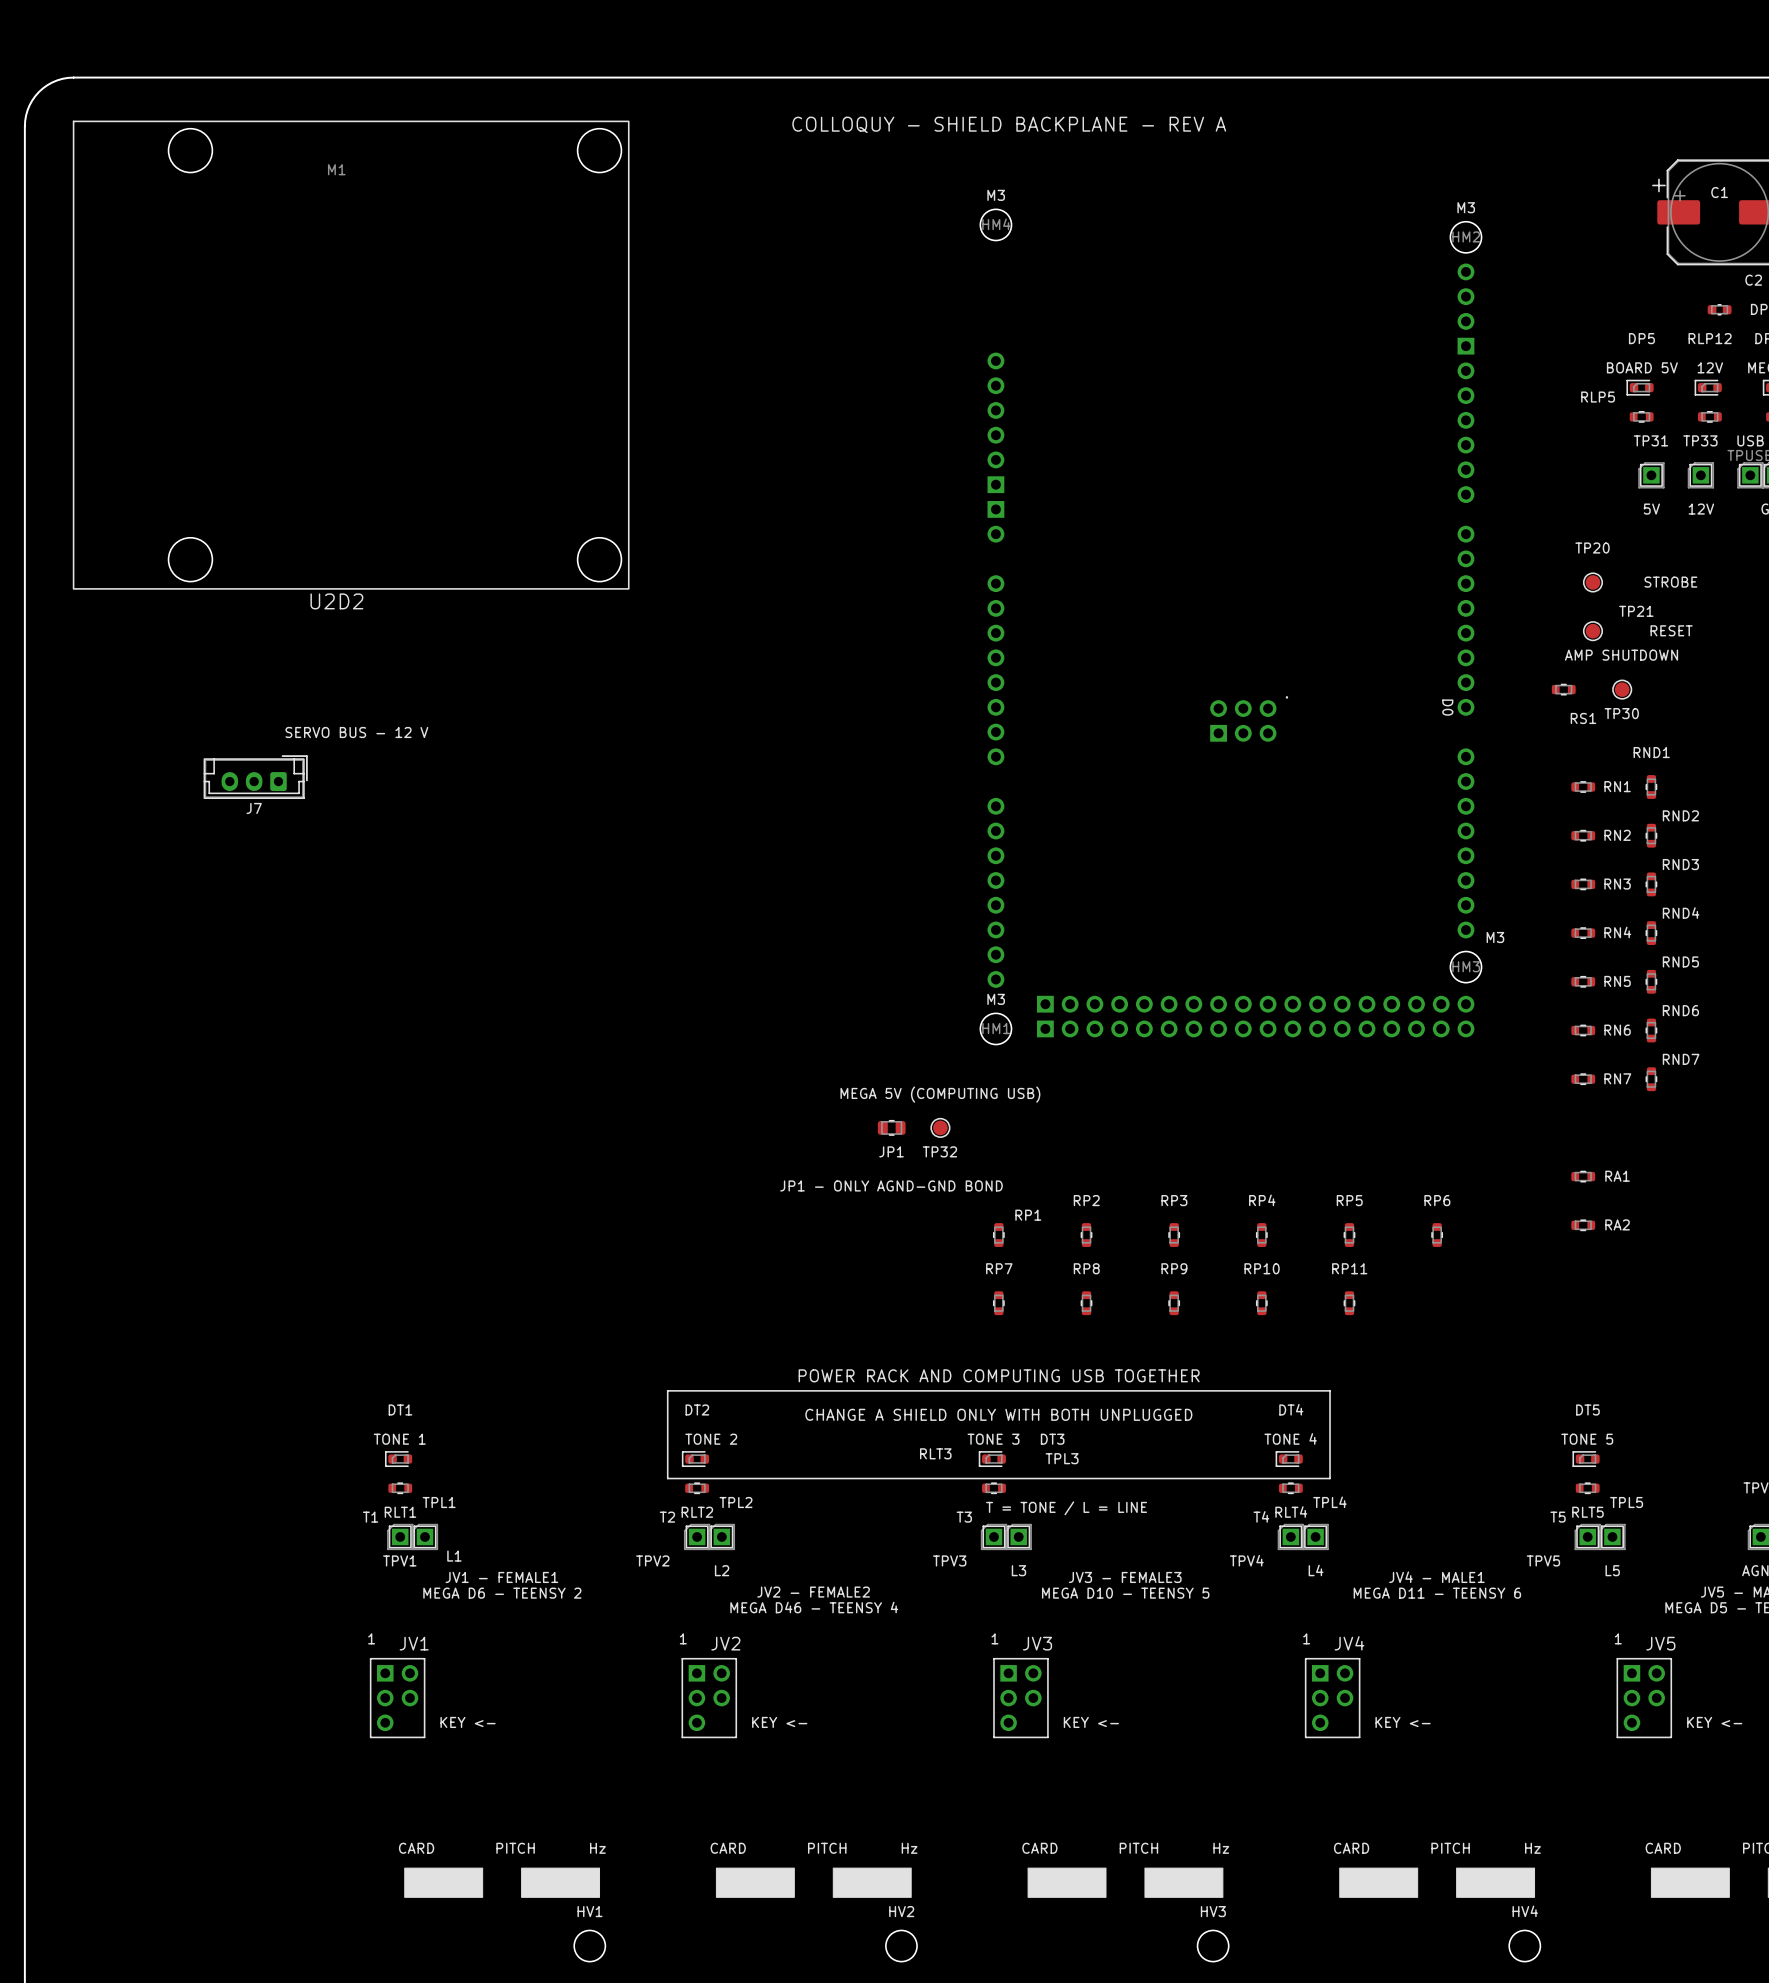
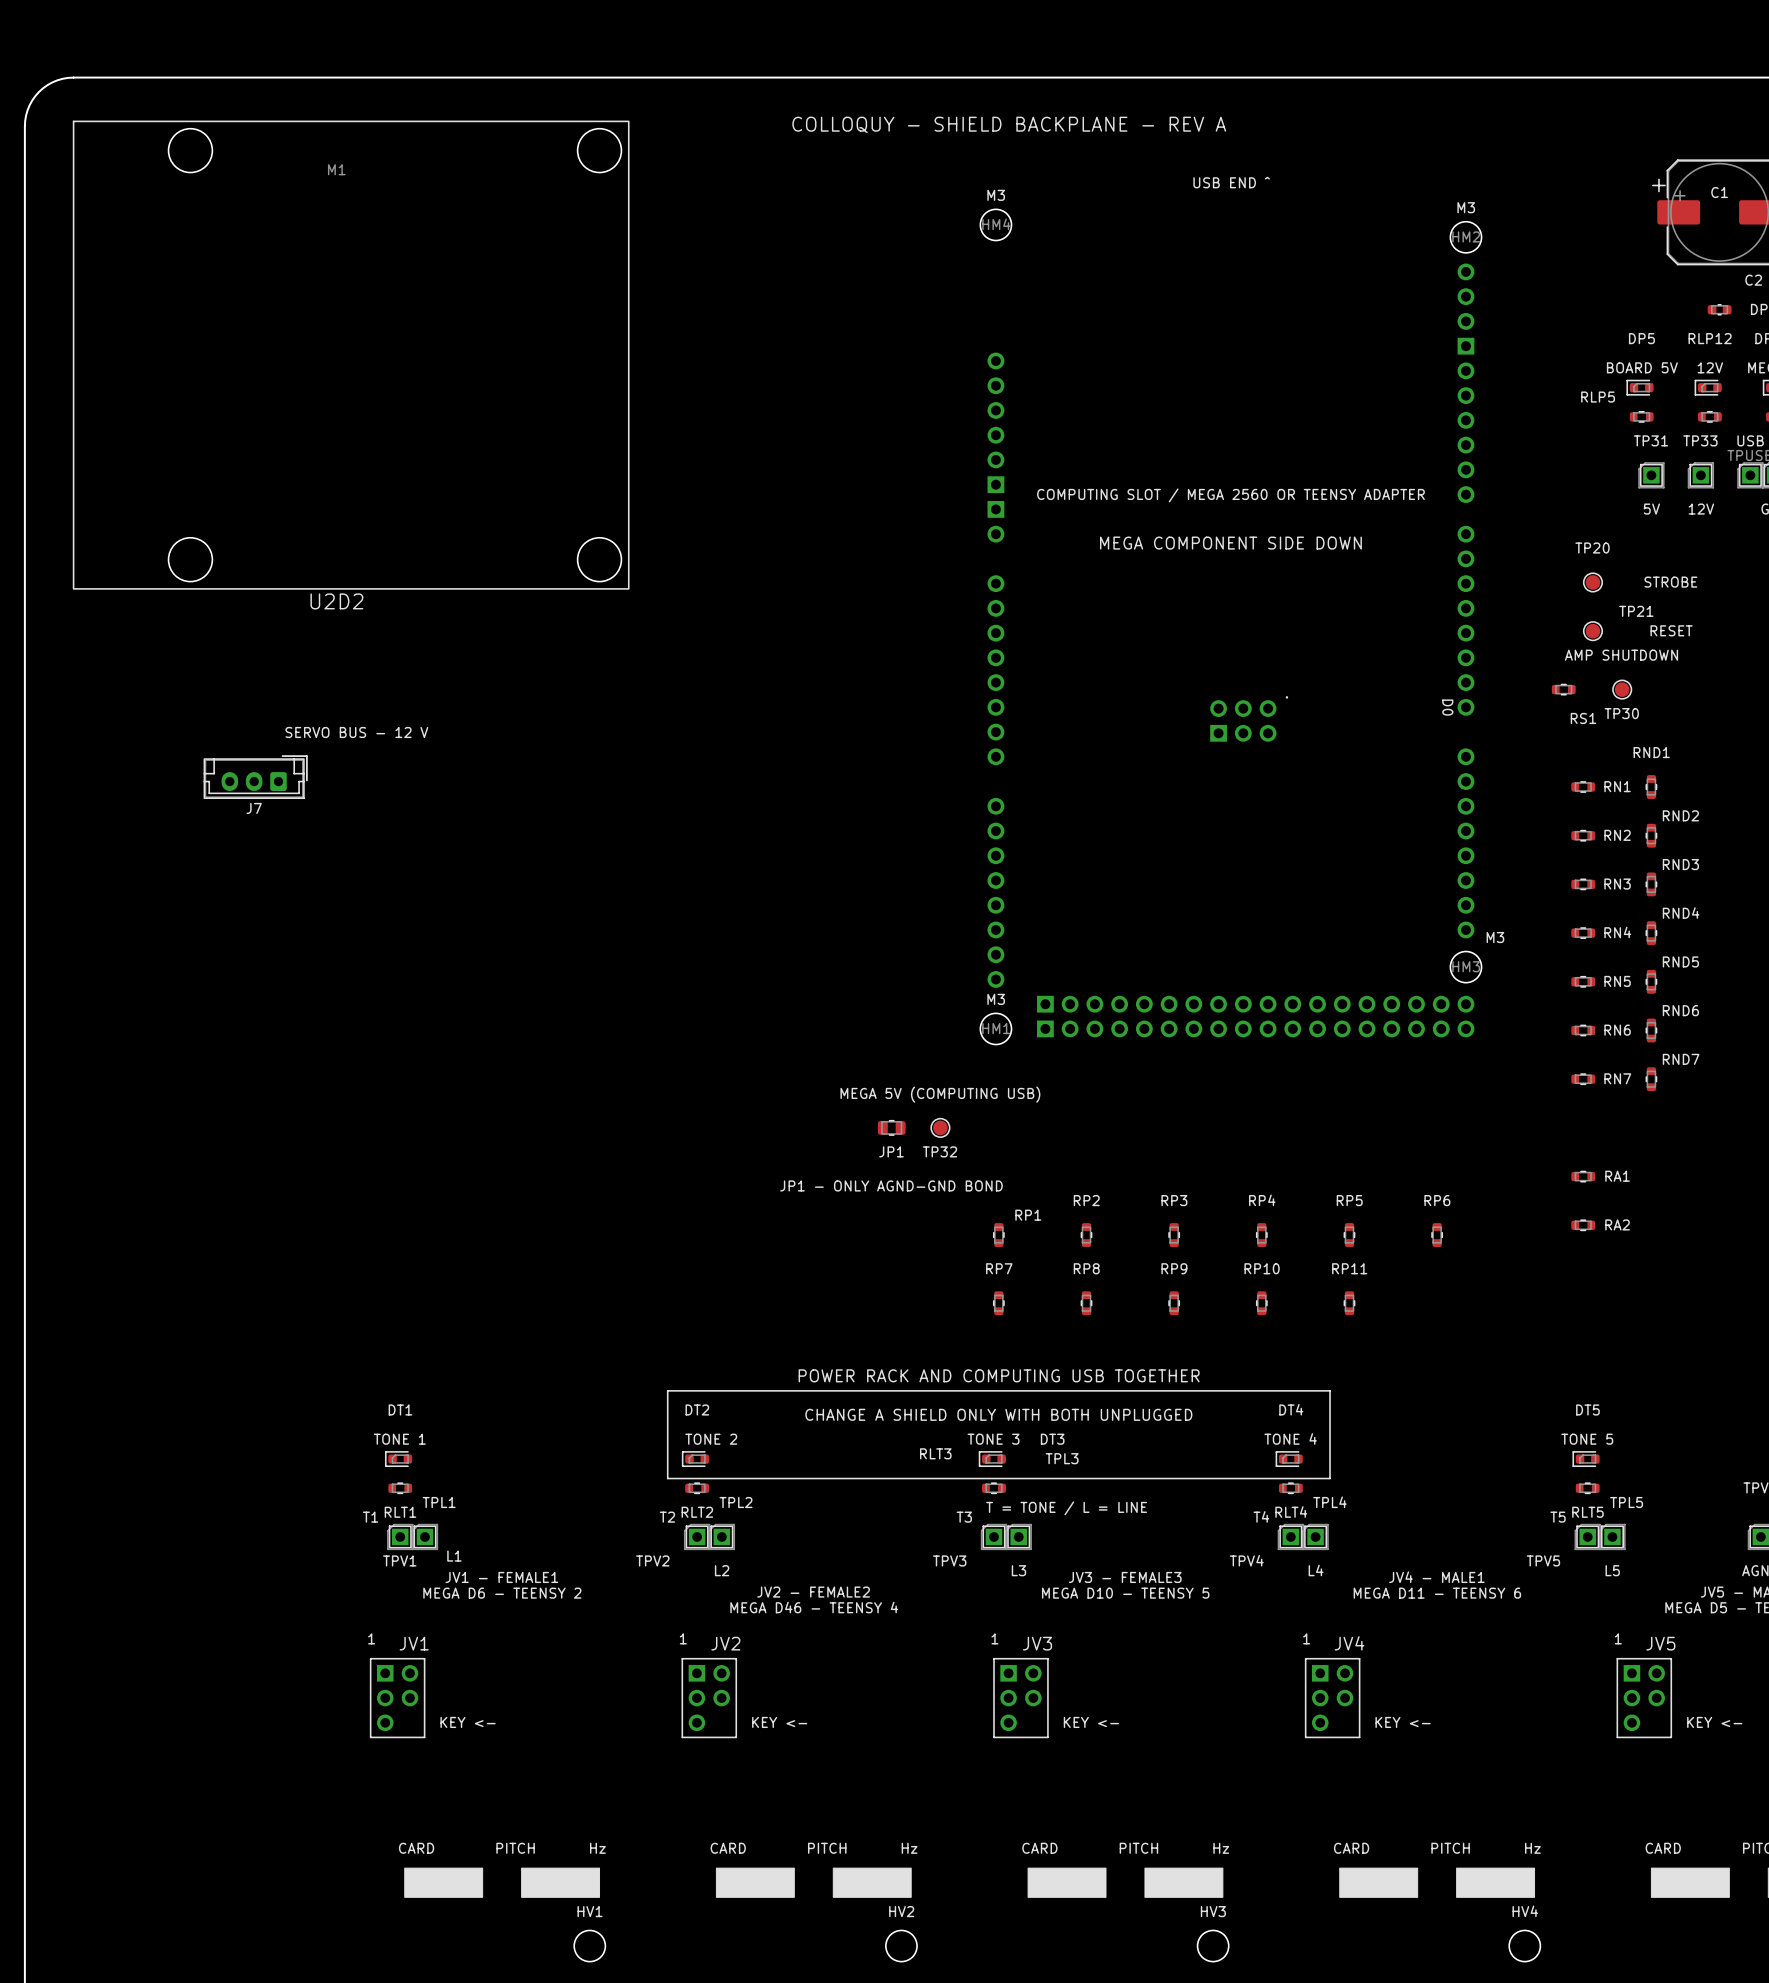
text: none -> USB END ^ (1231, 182)
text: none -> COMPUTING SLOT / MEGA 2560 OR TEENSY ADAPTER (1230, 495)
text: none -> MEGA COMPONENT SIDE DOWN (1230, 543)

